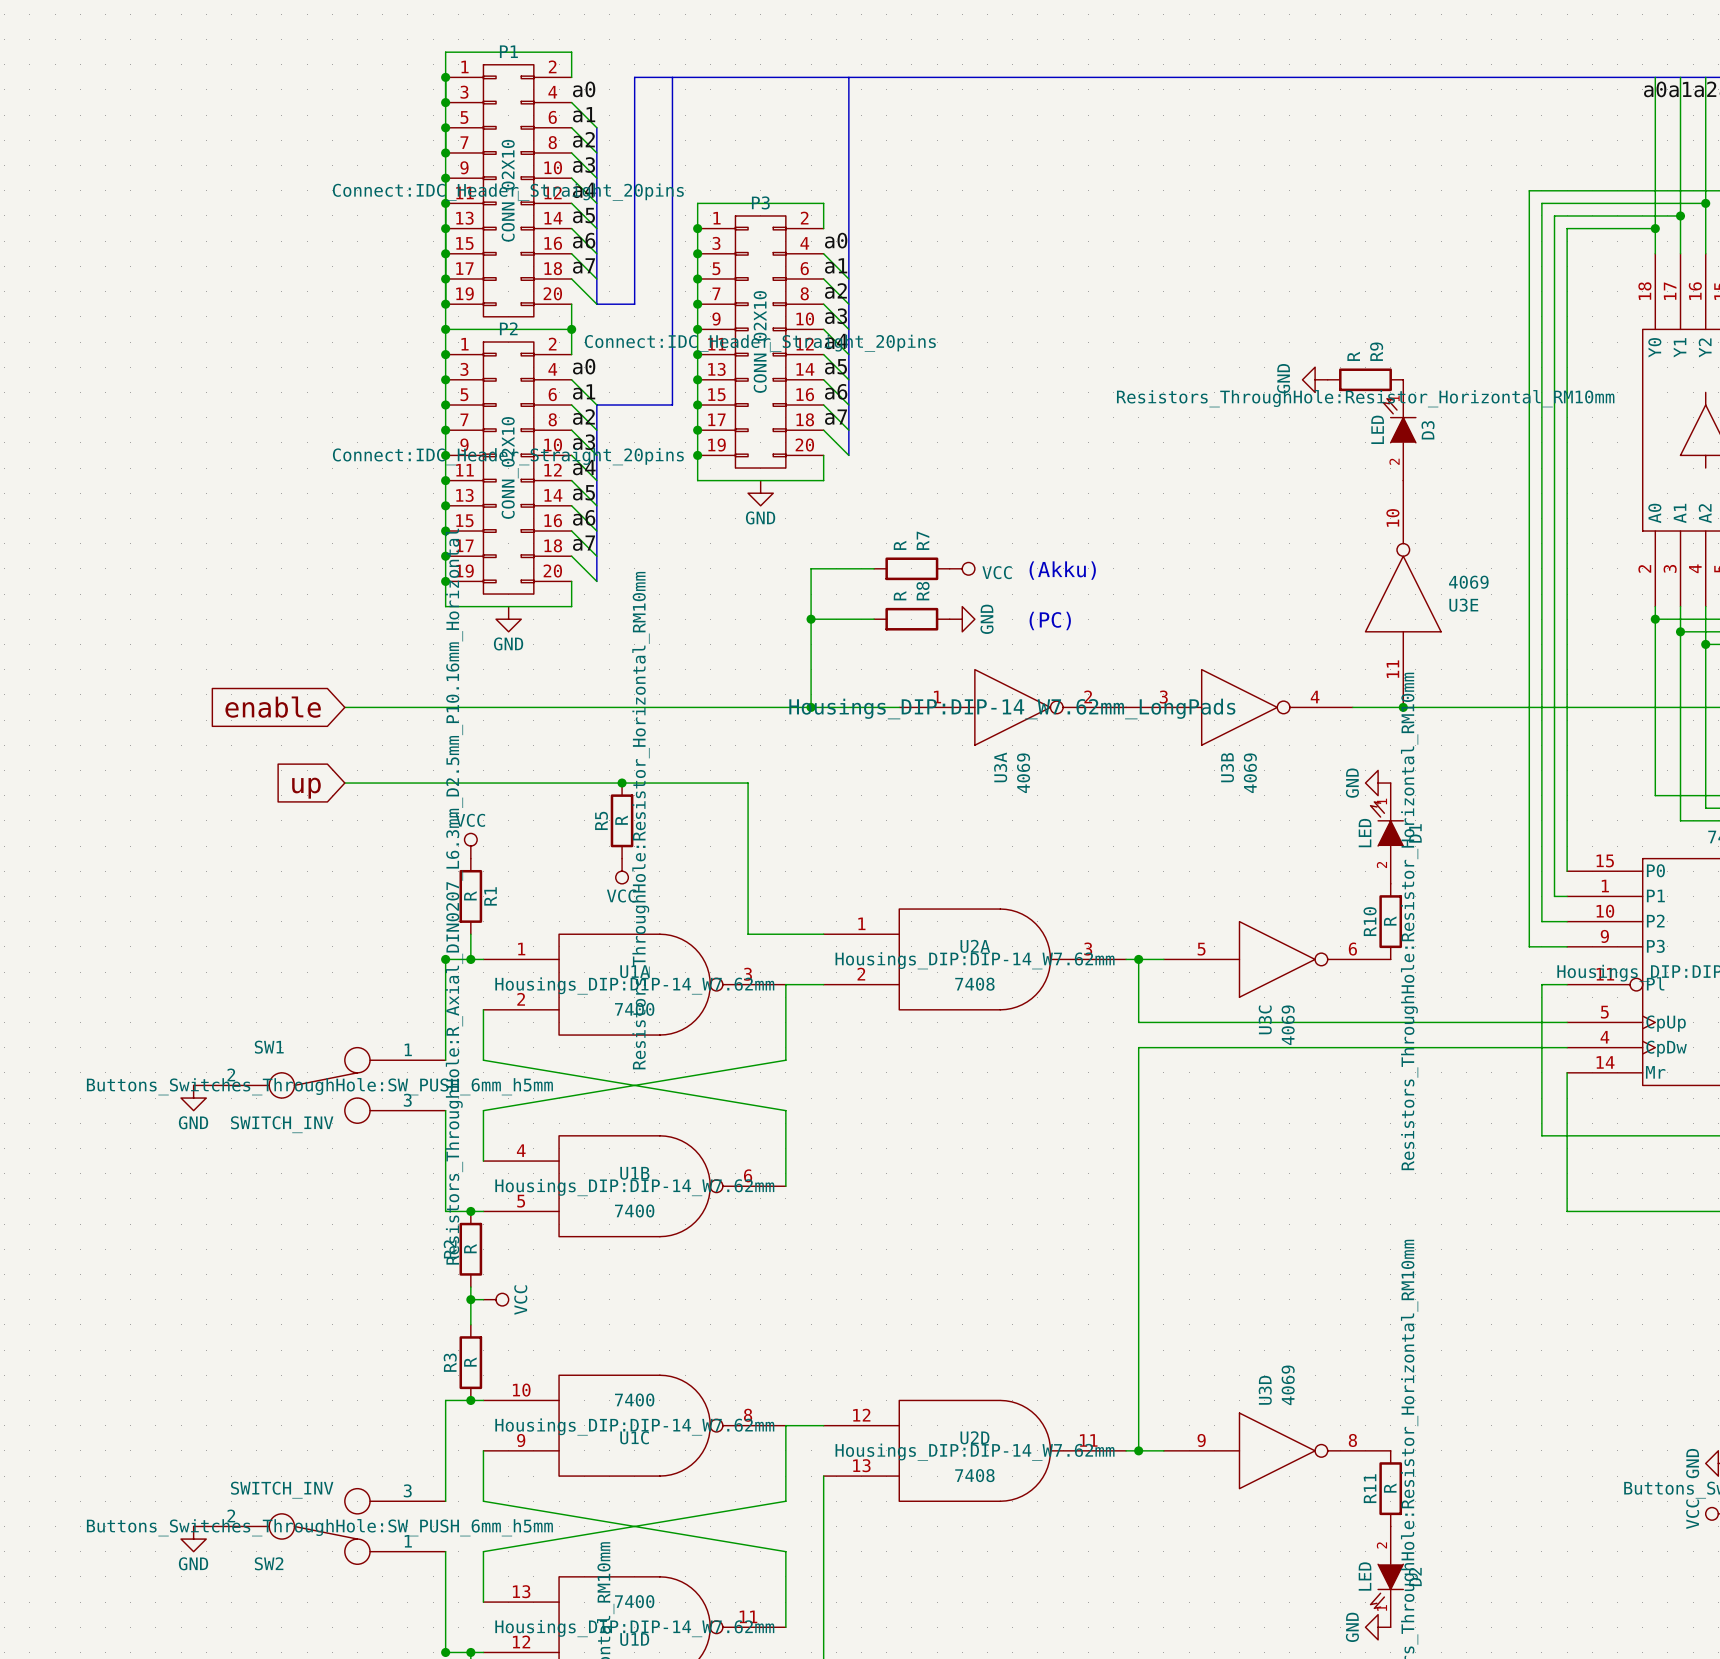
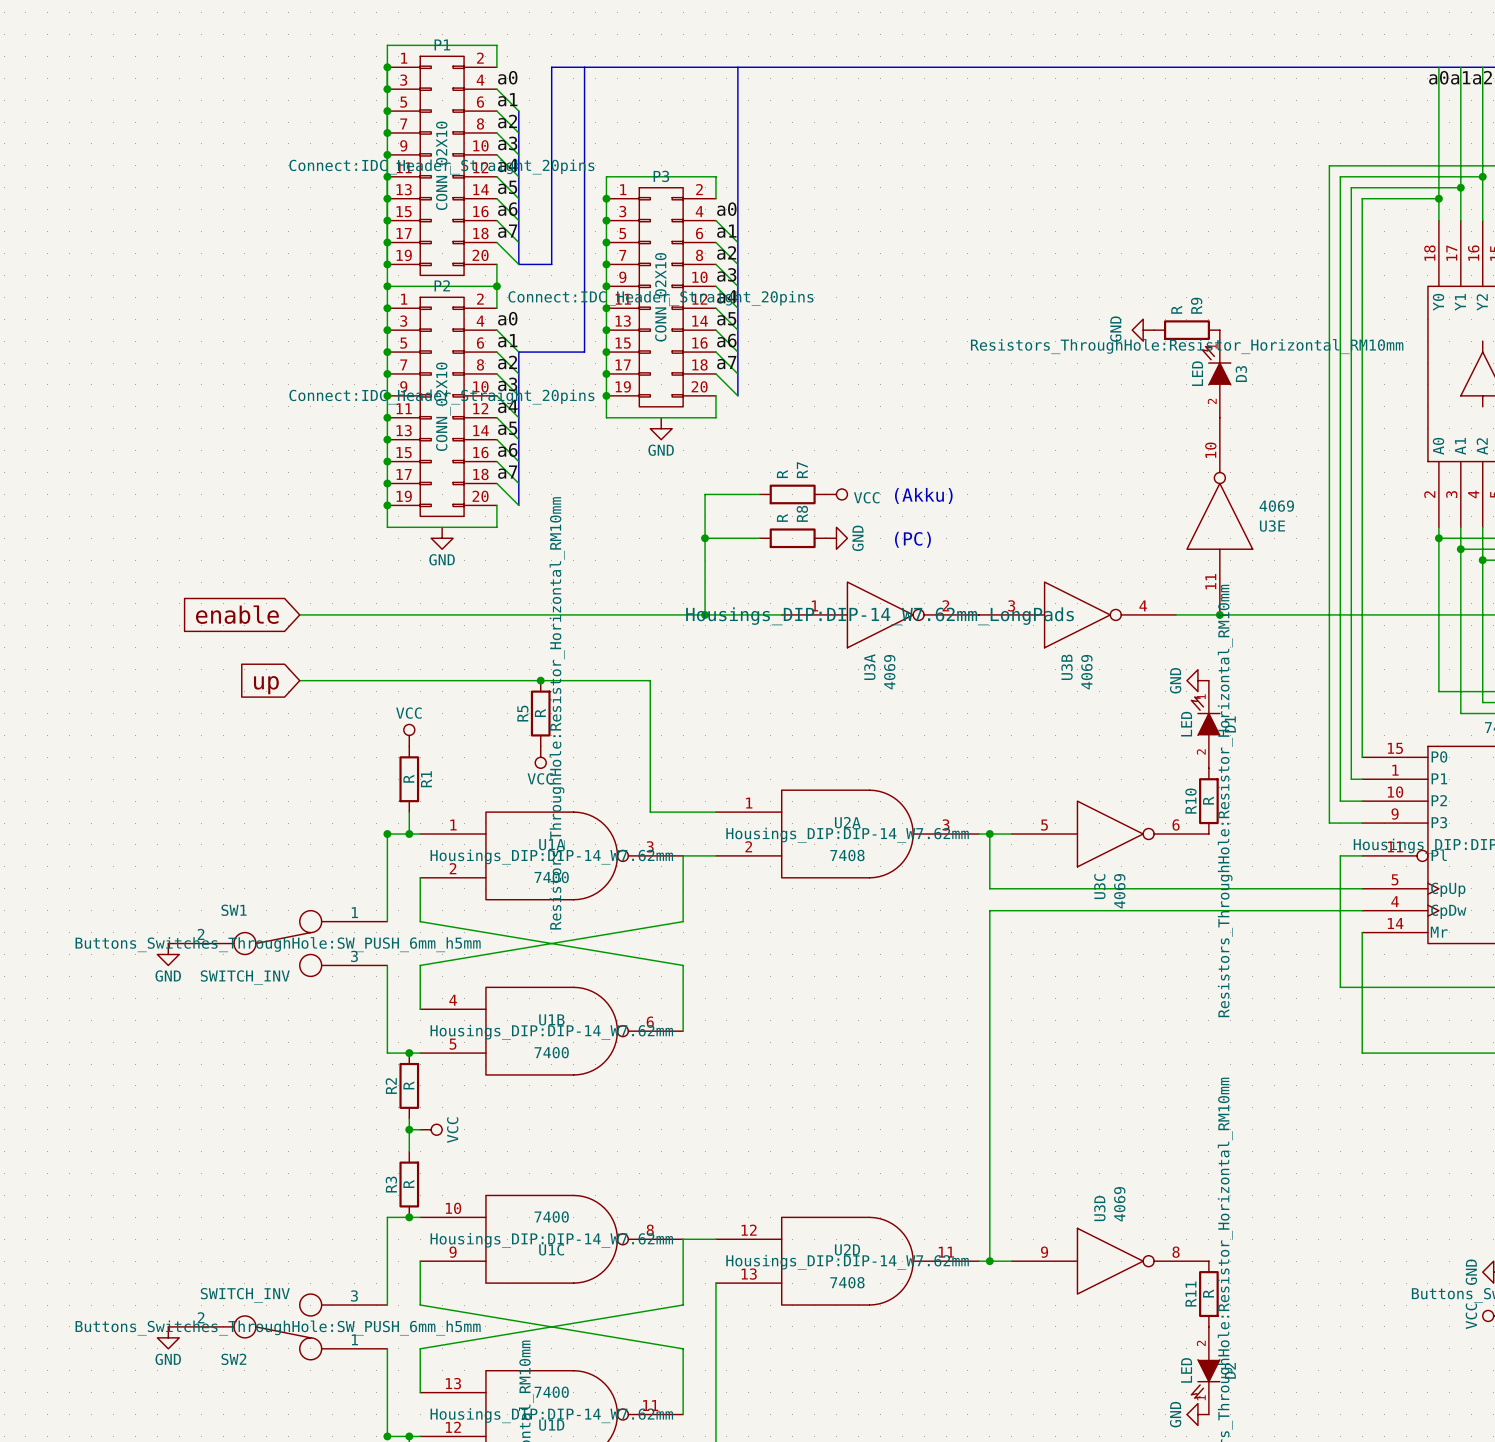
R1 text: Resistors_ThroughHole:R_Axial_DIN0207_L6.3mm_D2.5mm_P10.16mm_Horizontal (454, 896) -> none

